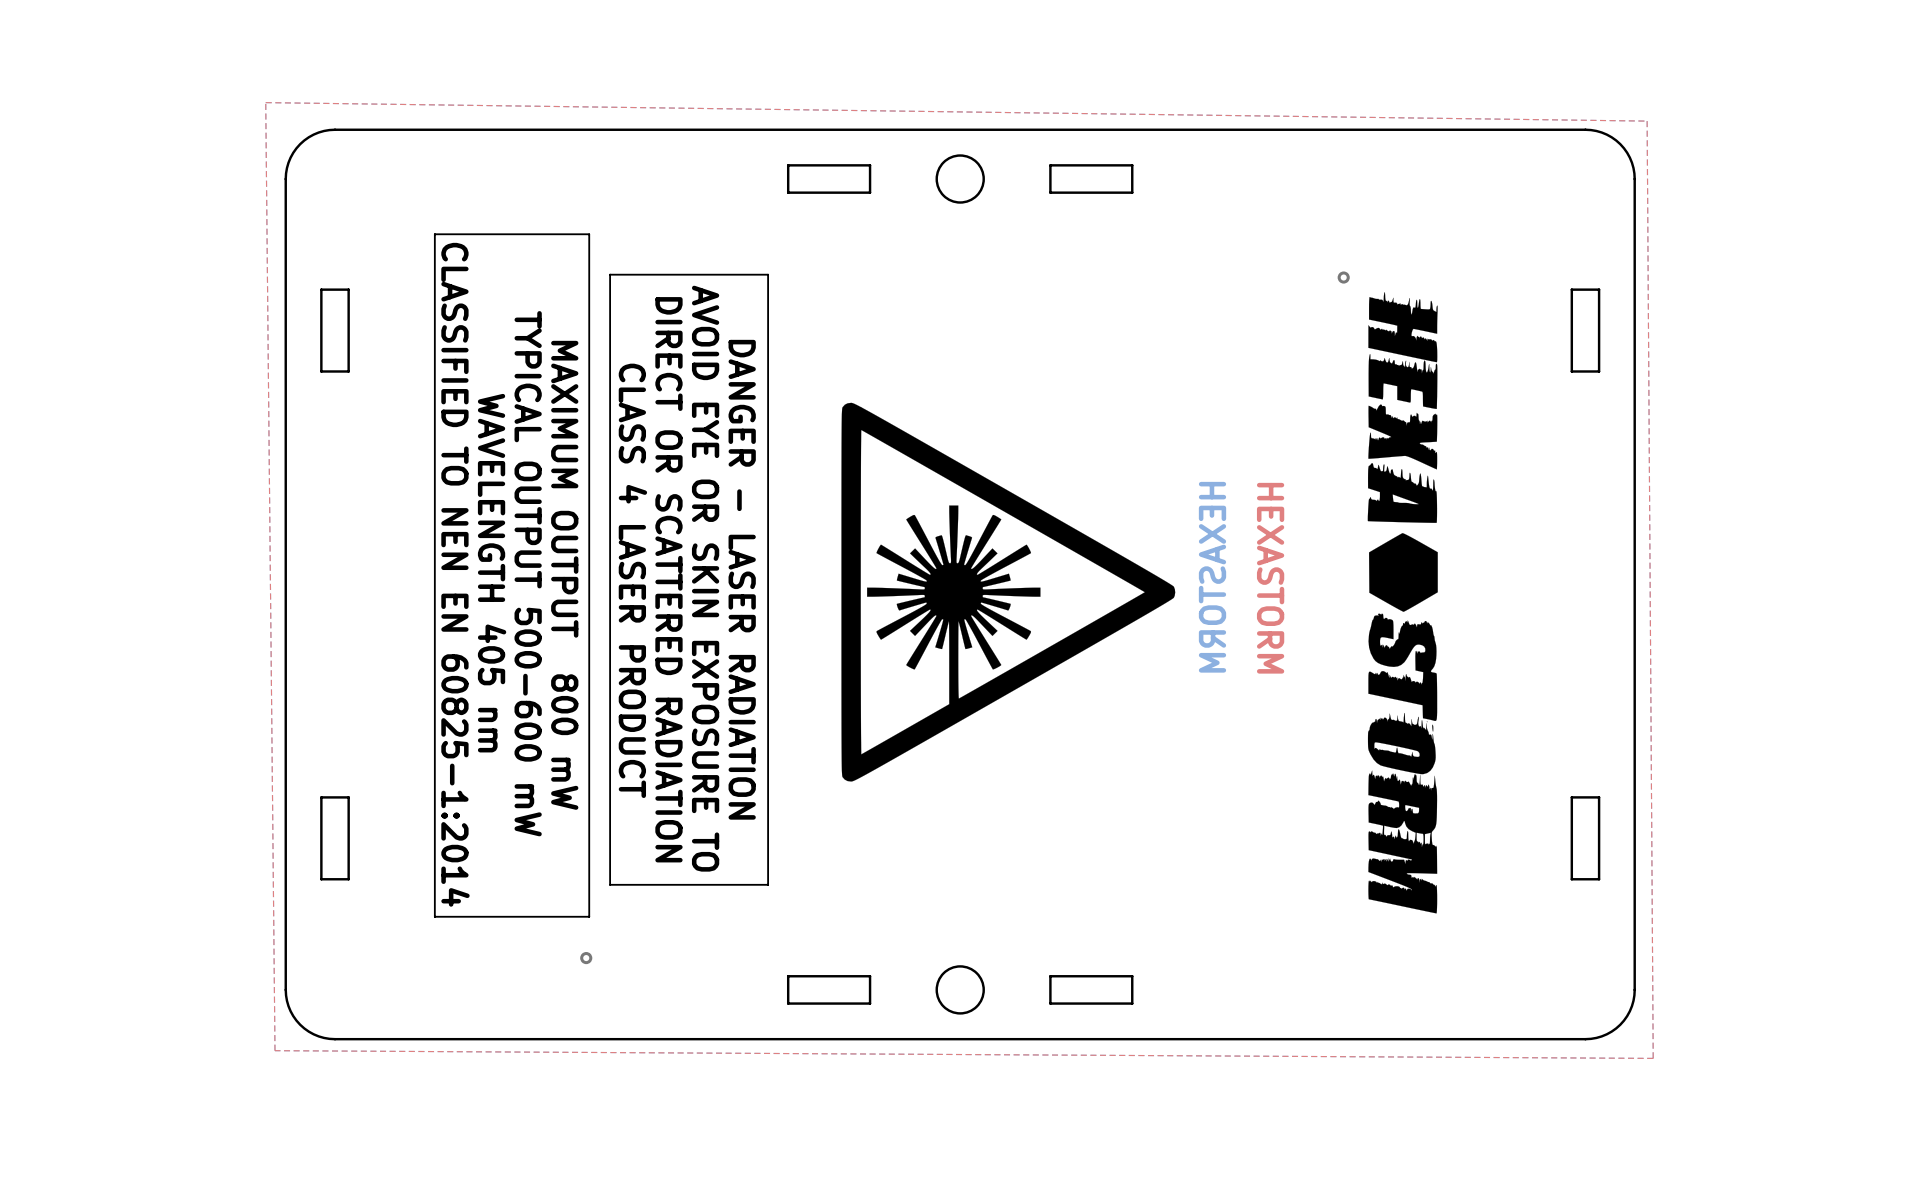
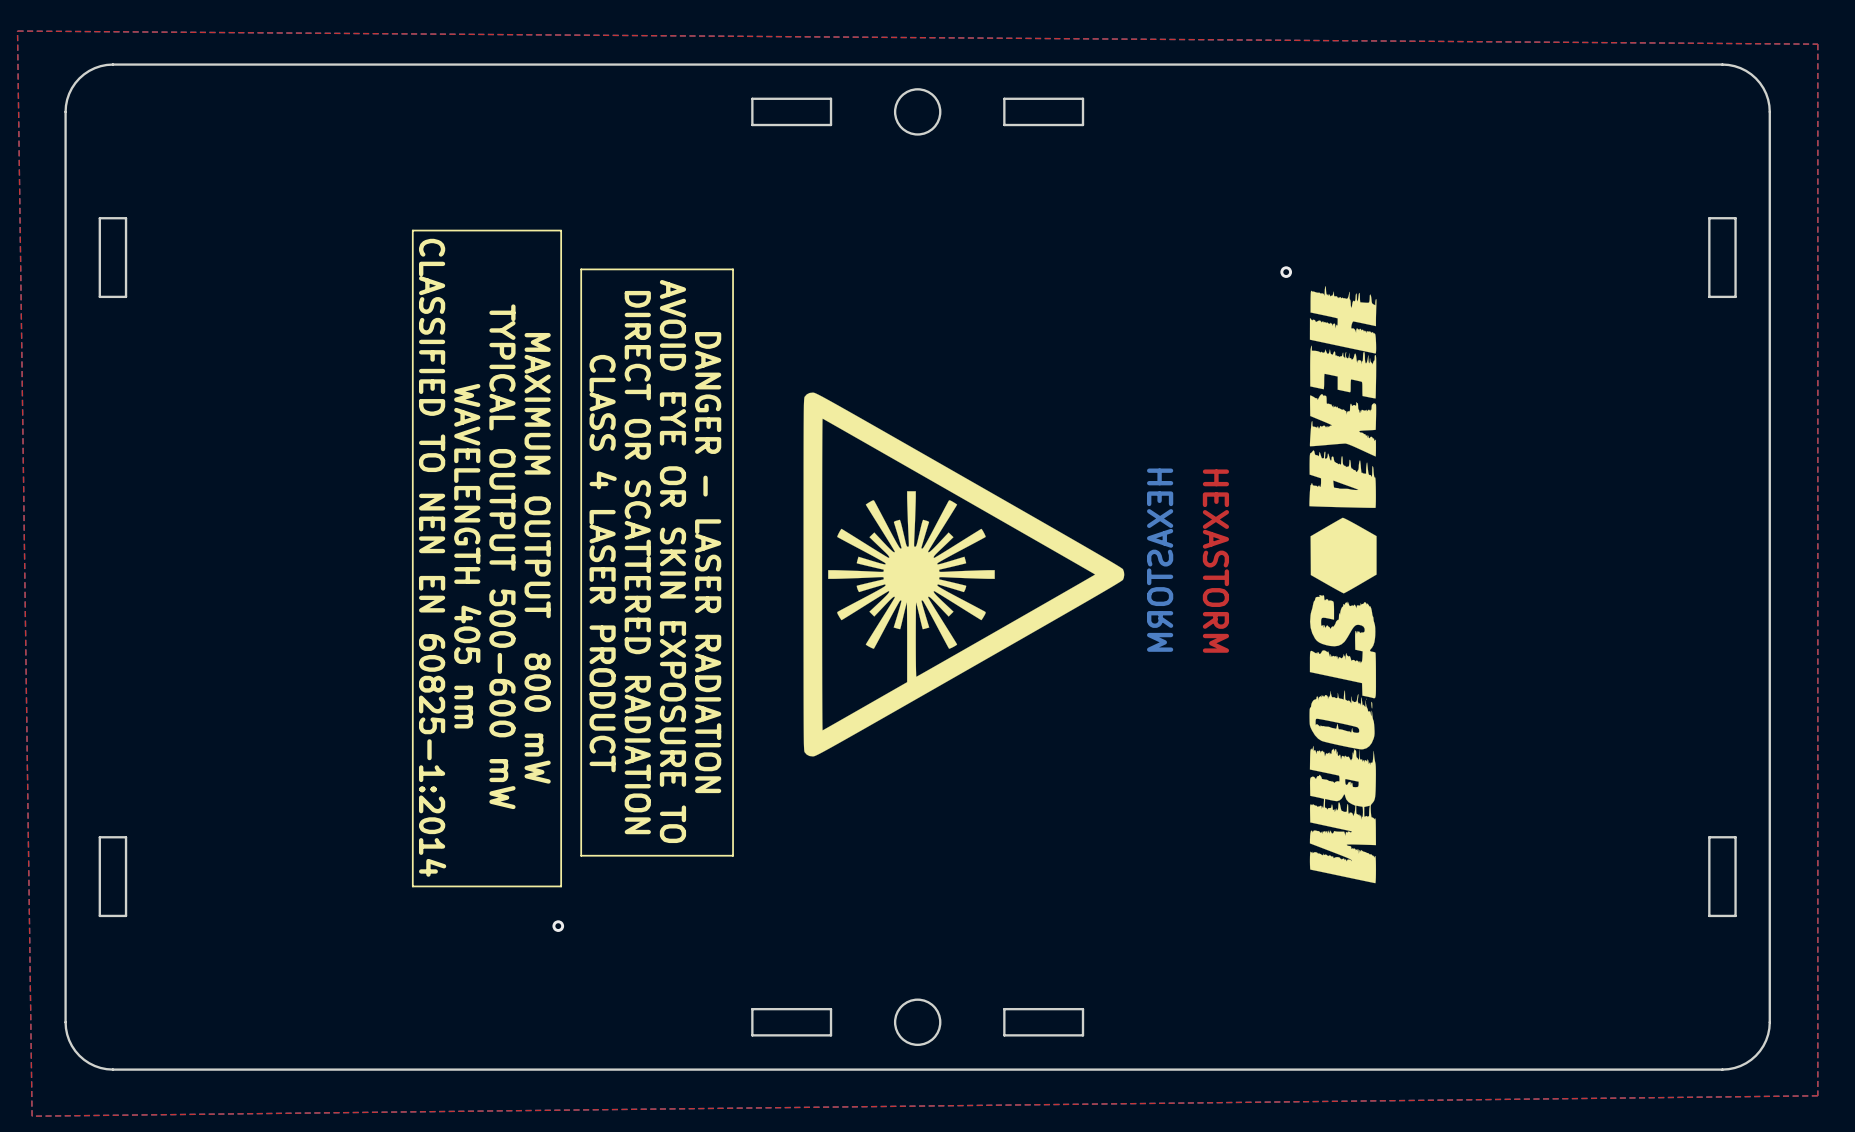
top zone outline: (265, 102) (274, 1050) (1653, 1058) (1647, 121) (265, 102) -> (17, 31) (32, 1116) (1817, 1095) (1817, 44) (17, 31)
board edge: (335, 129) (1585, 129) (1596, 130) (1611, 137) (1620, 144) (1629, 157) (1634, 179) (1634, 989) (1633, 1000) (1627, 1016) (1620, 1024) (1606, 1034) (1585, 1039) (335, 1039) (318, 1036) (308, 1031) (293, 1016) (288, 1006) (285, 989) (285, 179) (288, 162) (300, 144) (313, 134) (335, 129) -> (112, 64) (94, 68) (79, 78) (69, 93) (65, 111) (65, 1022) (67, 1034) (71, 1045) (79, 1055) (89, 1063) (100, 1067) (112, 1069) (1722, 1069) (1734, 1067) (1746, 1063) (1755, 1055) (1763, 1045) (1768, 1034) (1769, 1022) (1769, 111) (1768, 99) (1763, 88) (1755, 78) (1746, 70) (1734, 66) (1722, 64) (112, 64)
board edge: (788, 165) (870, 165) (870, 192) (788, 192) (788, 165) -> (752, 98) (831, 98) (831, 125) (752, 125) (752, 98)
board edge: (1050, 165) (1050, 192) (1132, 192) (1132, 165) (1050, 165) -> (1004, 98) (1004, 125) (1083, 125) (1083, 98) (1004, 98)
round board edge position: (960, 179) -> (917, 111)
board edge: (321, 289) (348, 289) (348, 371) (321, 371) (321, 289) -> (99, 218) (126, 218) (126, 296) (99, 296) (99, 218)
board edge: (1571, 289) (1571, 371) (1599, 371) (1599, 289) (1571, 289) -> (1709, 218) (1709, 296) (1735, 296) (1735, 218) (1709, 218)
board edge: (321, 797) (348, 797) (348, 879) (321, 879) (321, 797) -> (99, 837) (126, 837) (126, 915) (99, 915) (99, 837)
board edge: (1571, 797) (1571, 879) (1599, 879) (1599, 797) (1571, 797) -> (1709, 837) (1709, 915) (1735, 915) (1735, 837) (1709, 837)
board edge: (788, 976) (870, 976) (870, 1003) (788, 1003) (788, 976) -> (752, 1009) (831, 1009) (831, 1035) (752, 1035) (752, 1009)
board edge: (1050, 976) (1050, 1003) (1132, 1003) (1132, 976) (1050, 976) -> (1004, 1009) (1004, 1035) (1083, 1035) (1083, 1009) (1004, 1009)
round board edge position: (960, 989) -> (917, 1022)

